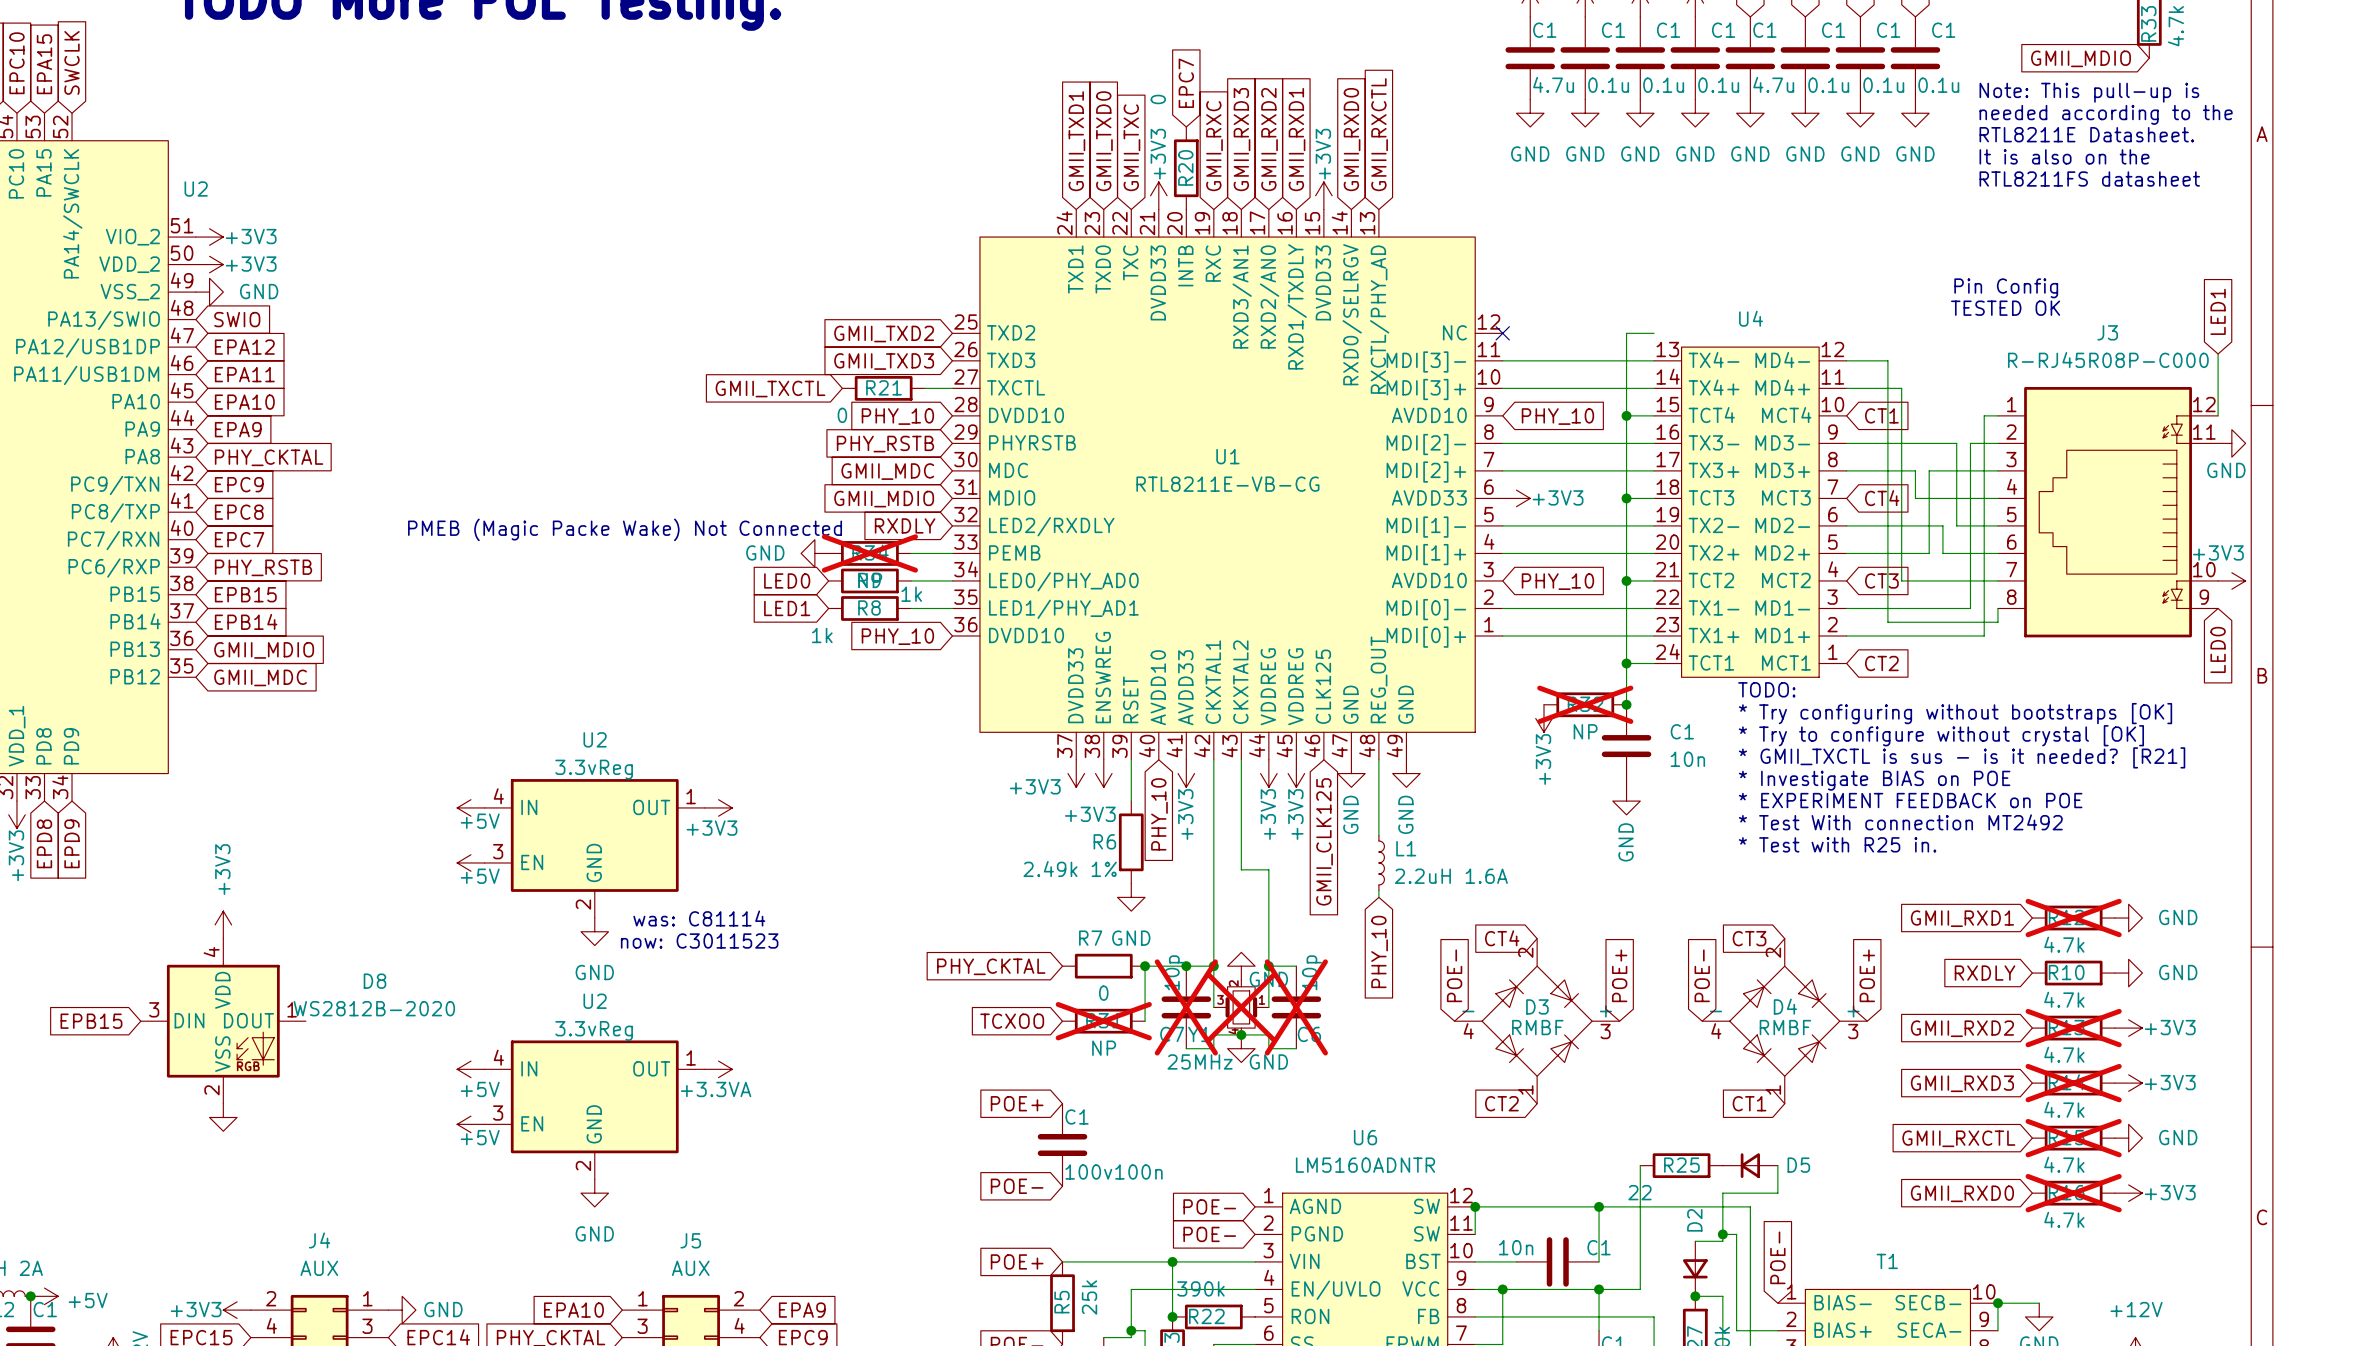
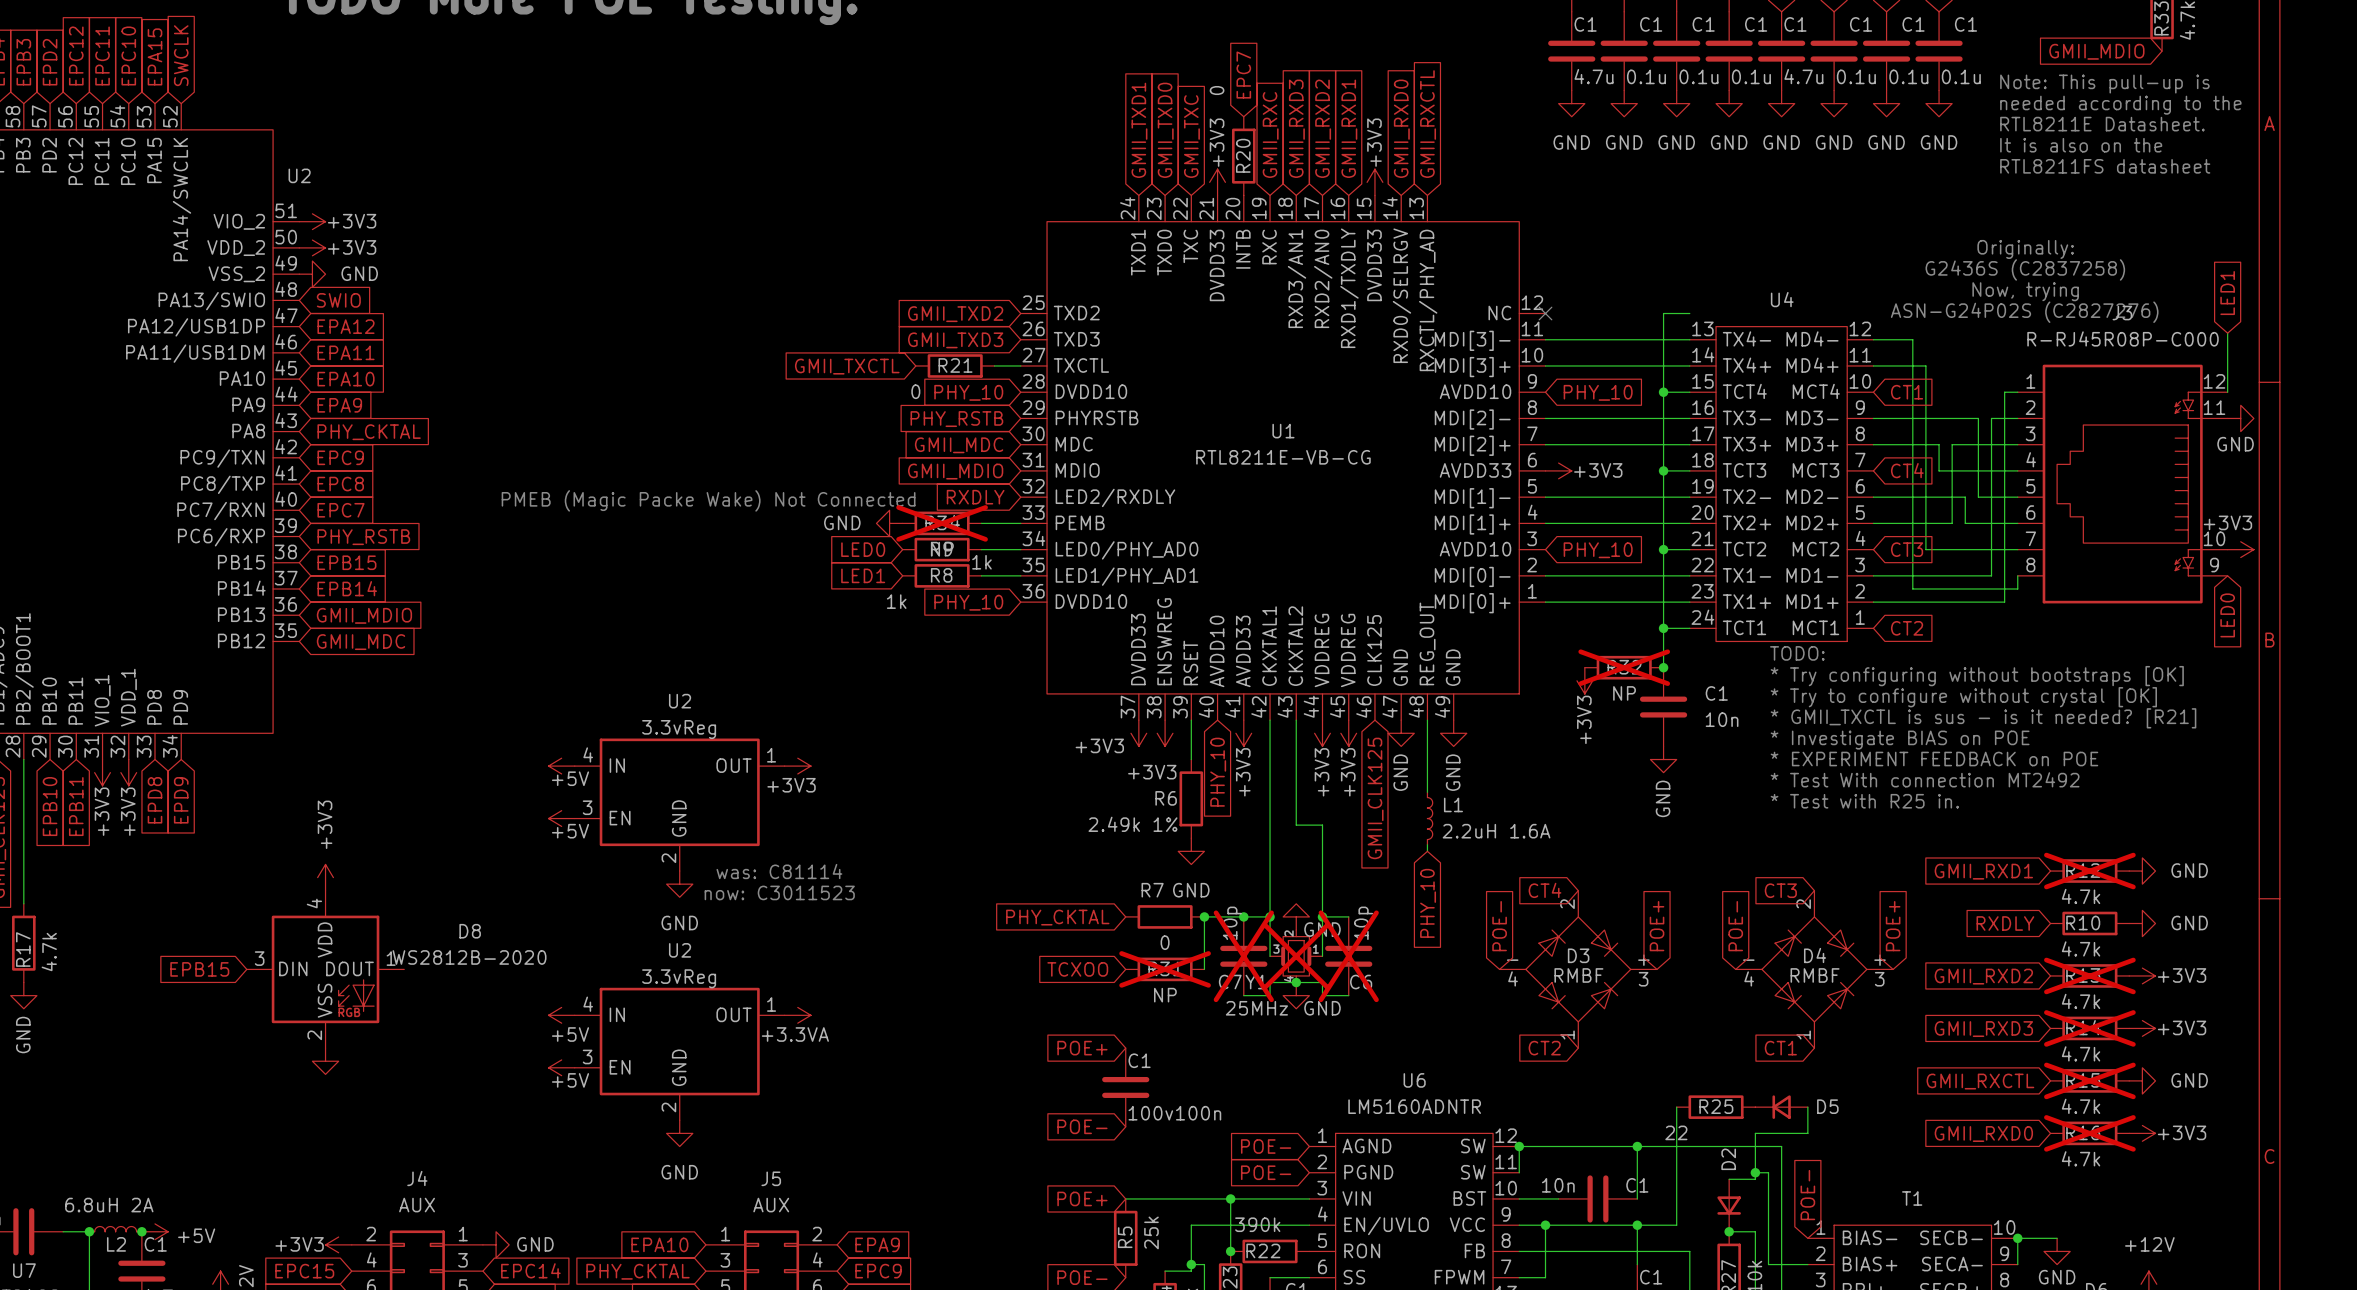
text: none -> Originally: (2025, 249)
text: Pin Config (2006, 288) -> G2436S (C2837258) (2025, 269)
text: TESTED OK (2005, 308) -> Now, trying (2025, 291)
text: none -> ASN-G24P02S (C2827276) (2024, 312)

